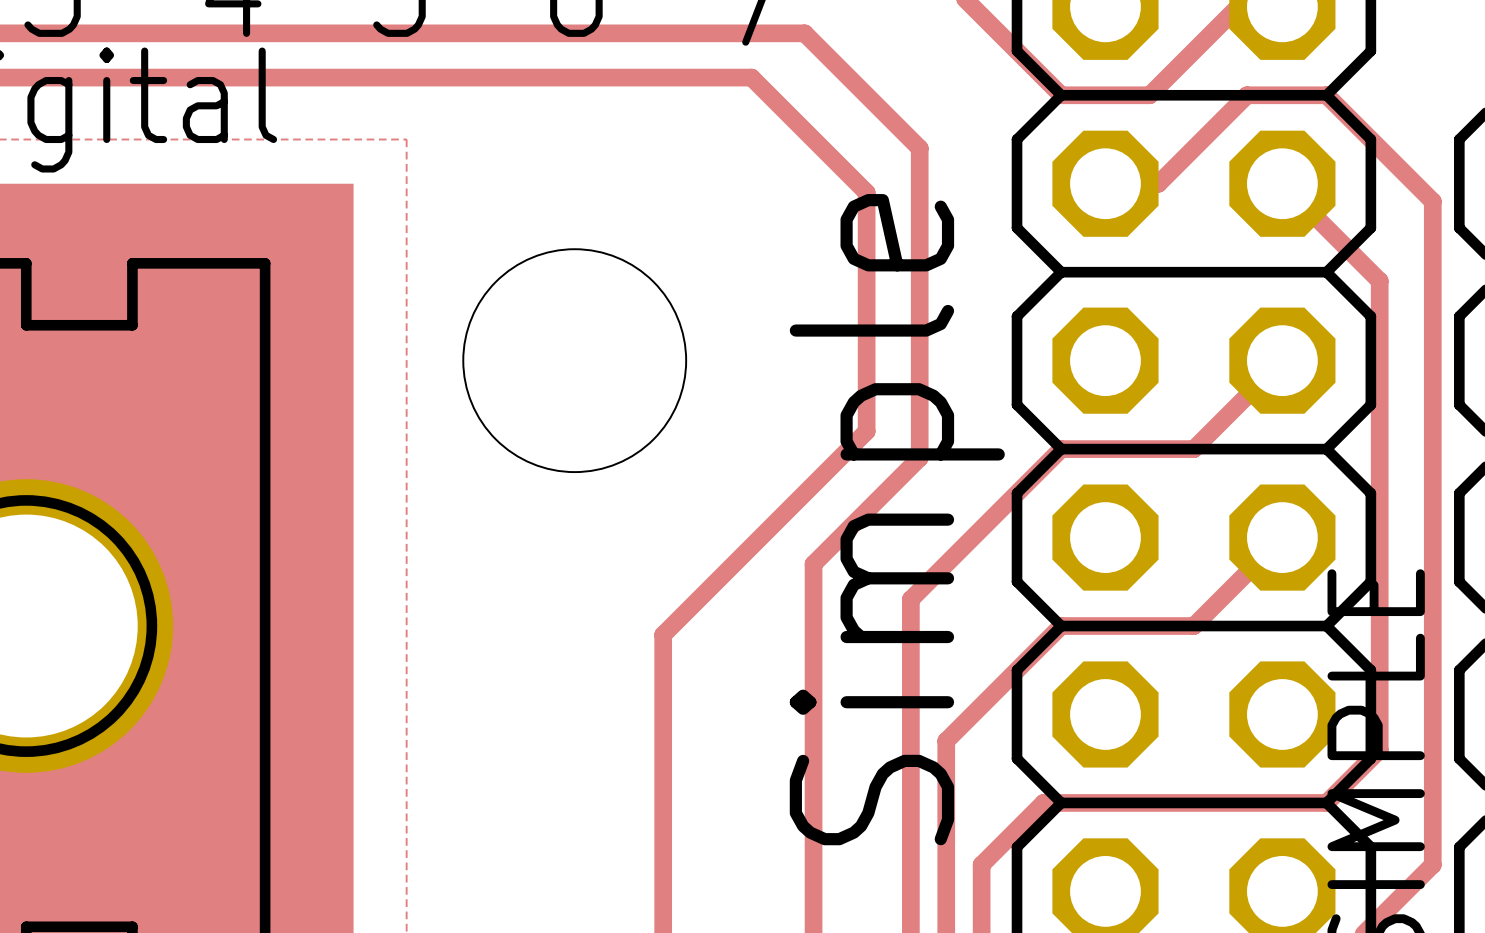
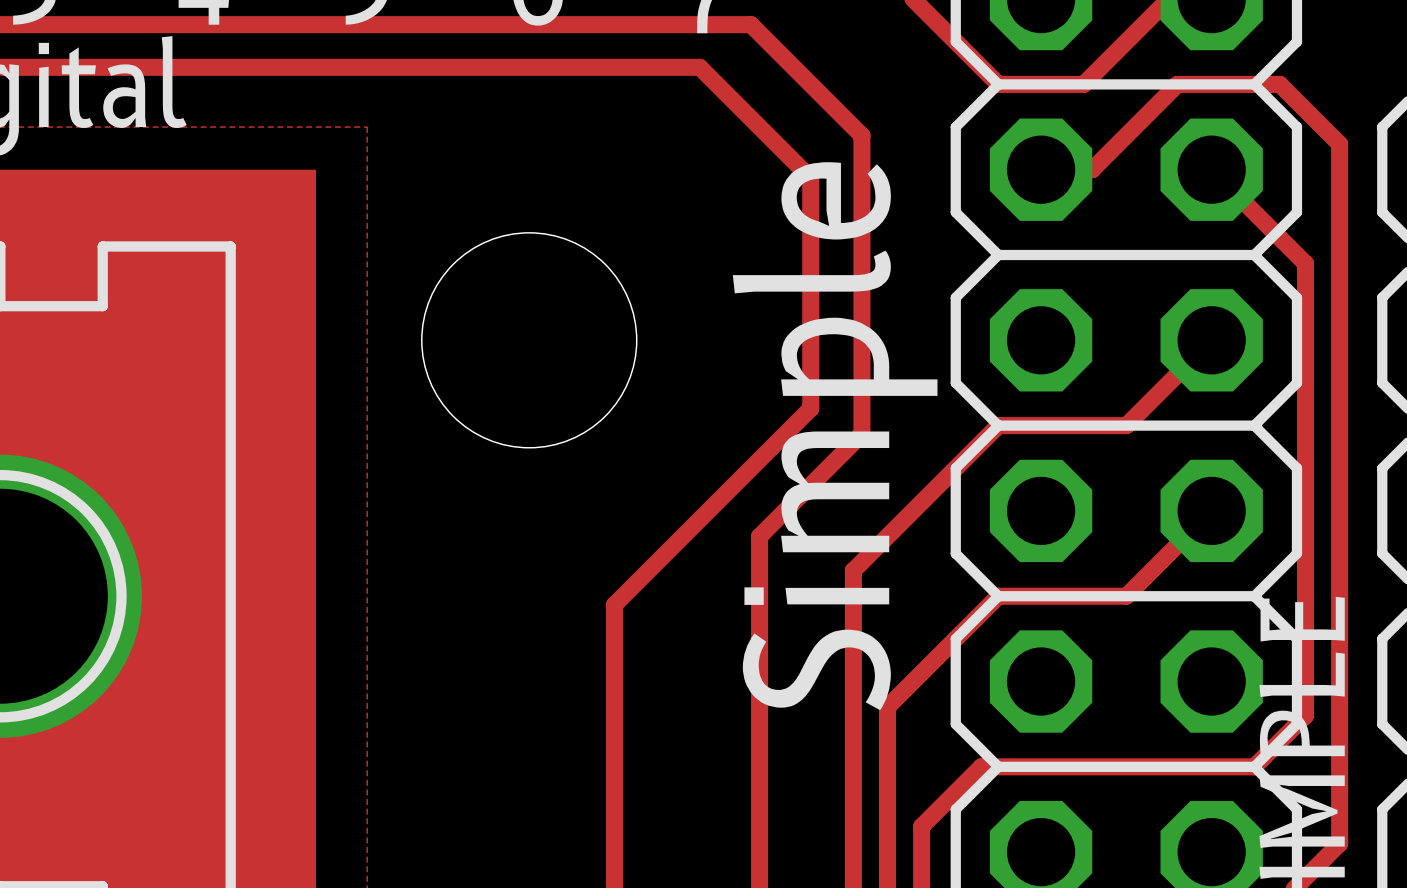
track: (1326, 95) (1432, 201) (1432, 864) (1415, 882) -> (1254, 84) (1279, 84) (1339, 144) (1339, 843)

